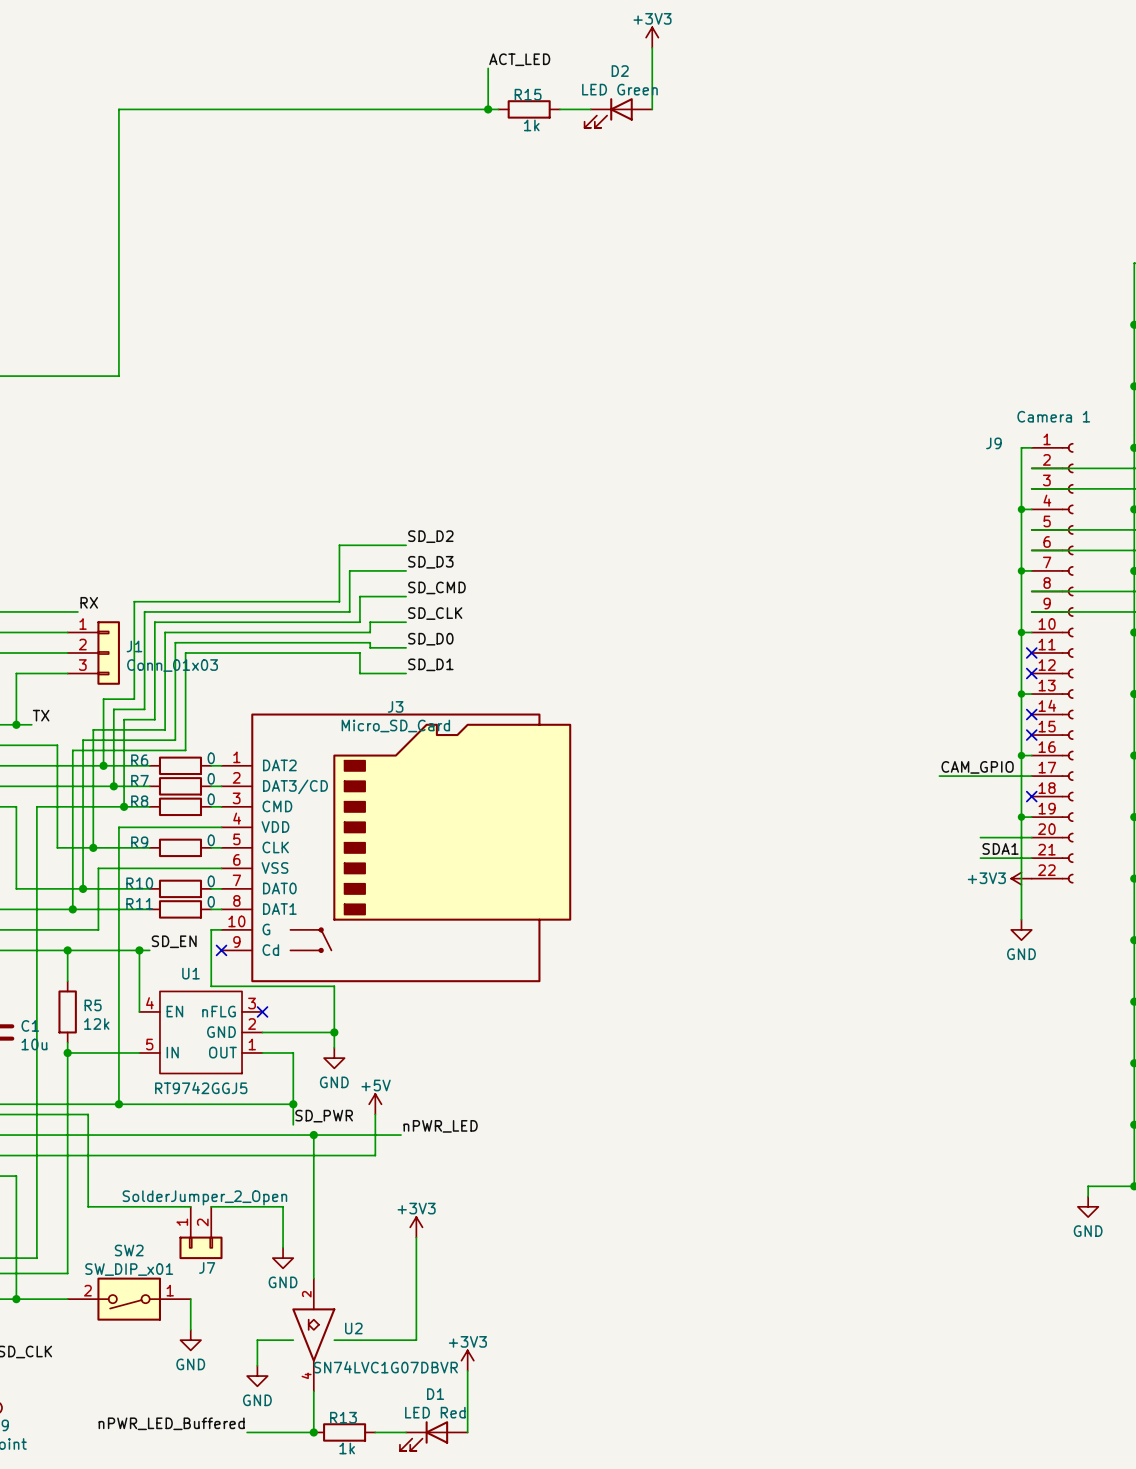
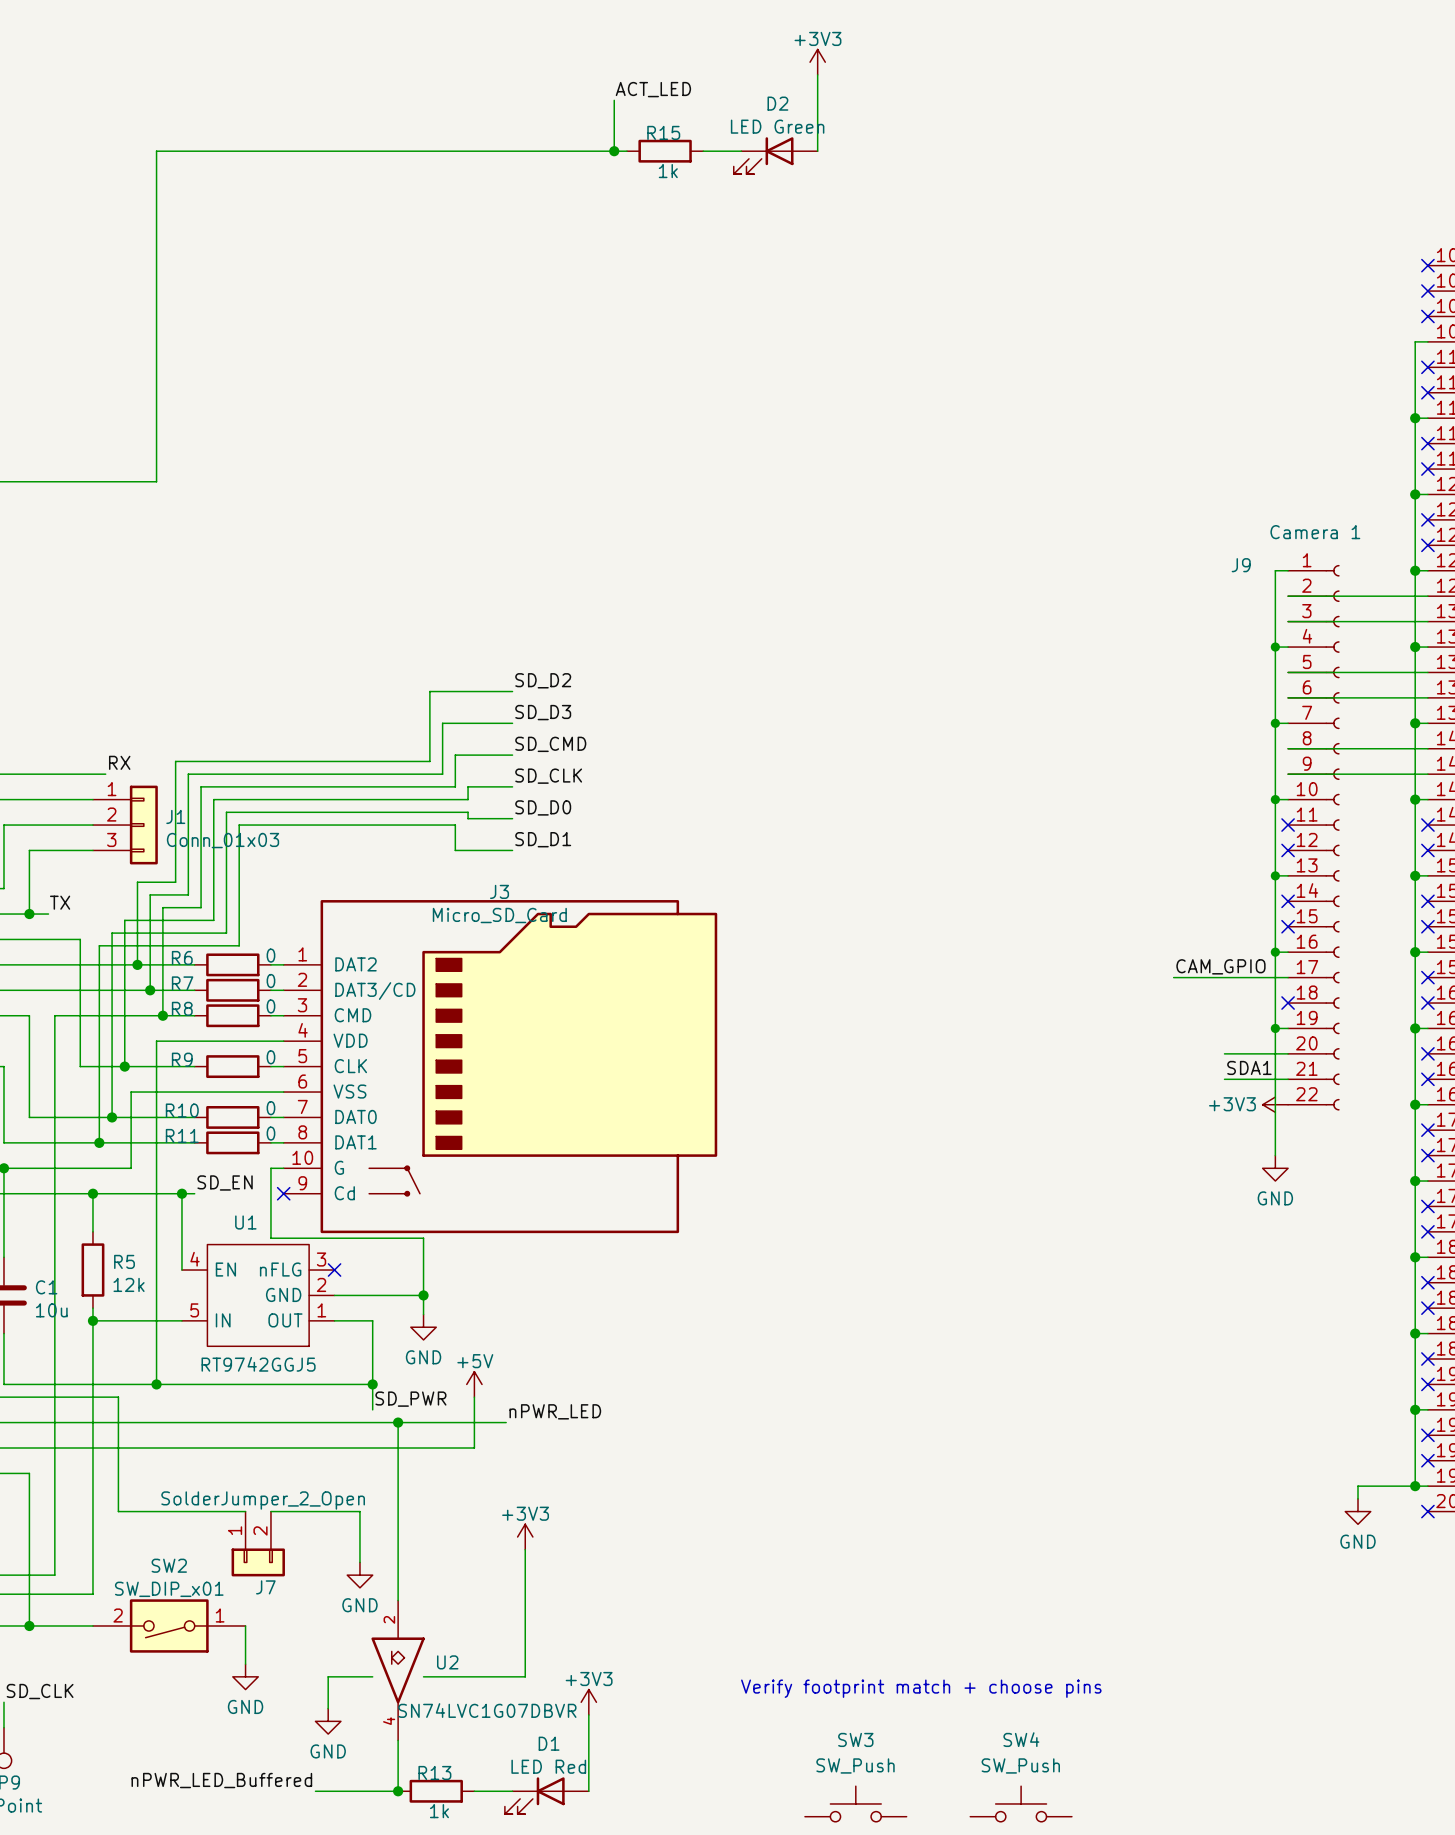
text: none -> Verify footprint match + choose pins (921, 1688)
SW3: none -> SW_Push (855, 1803)
SW4: none -> SW_Push (1021, 1803)

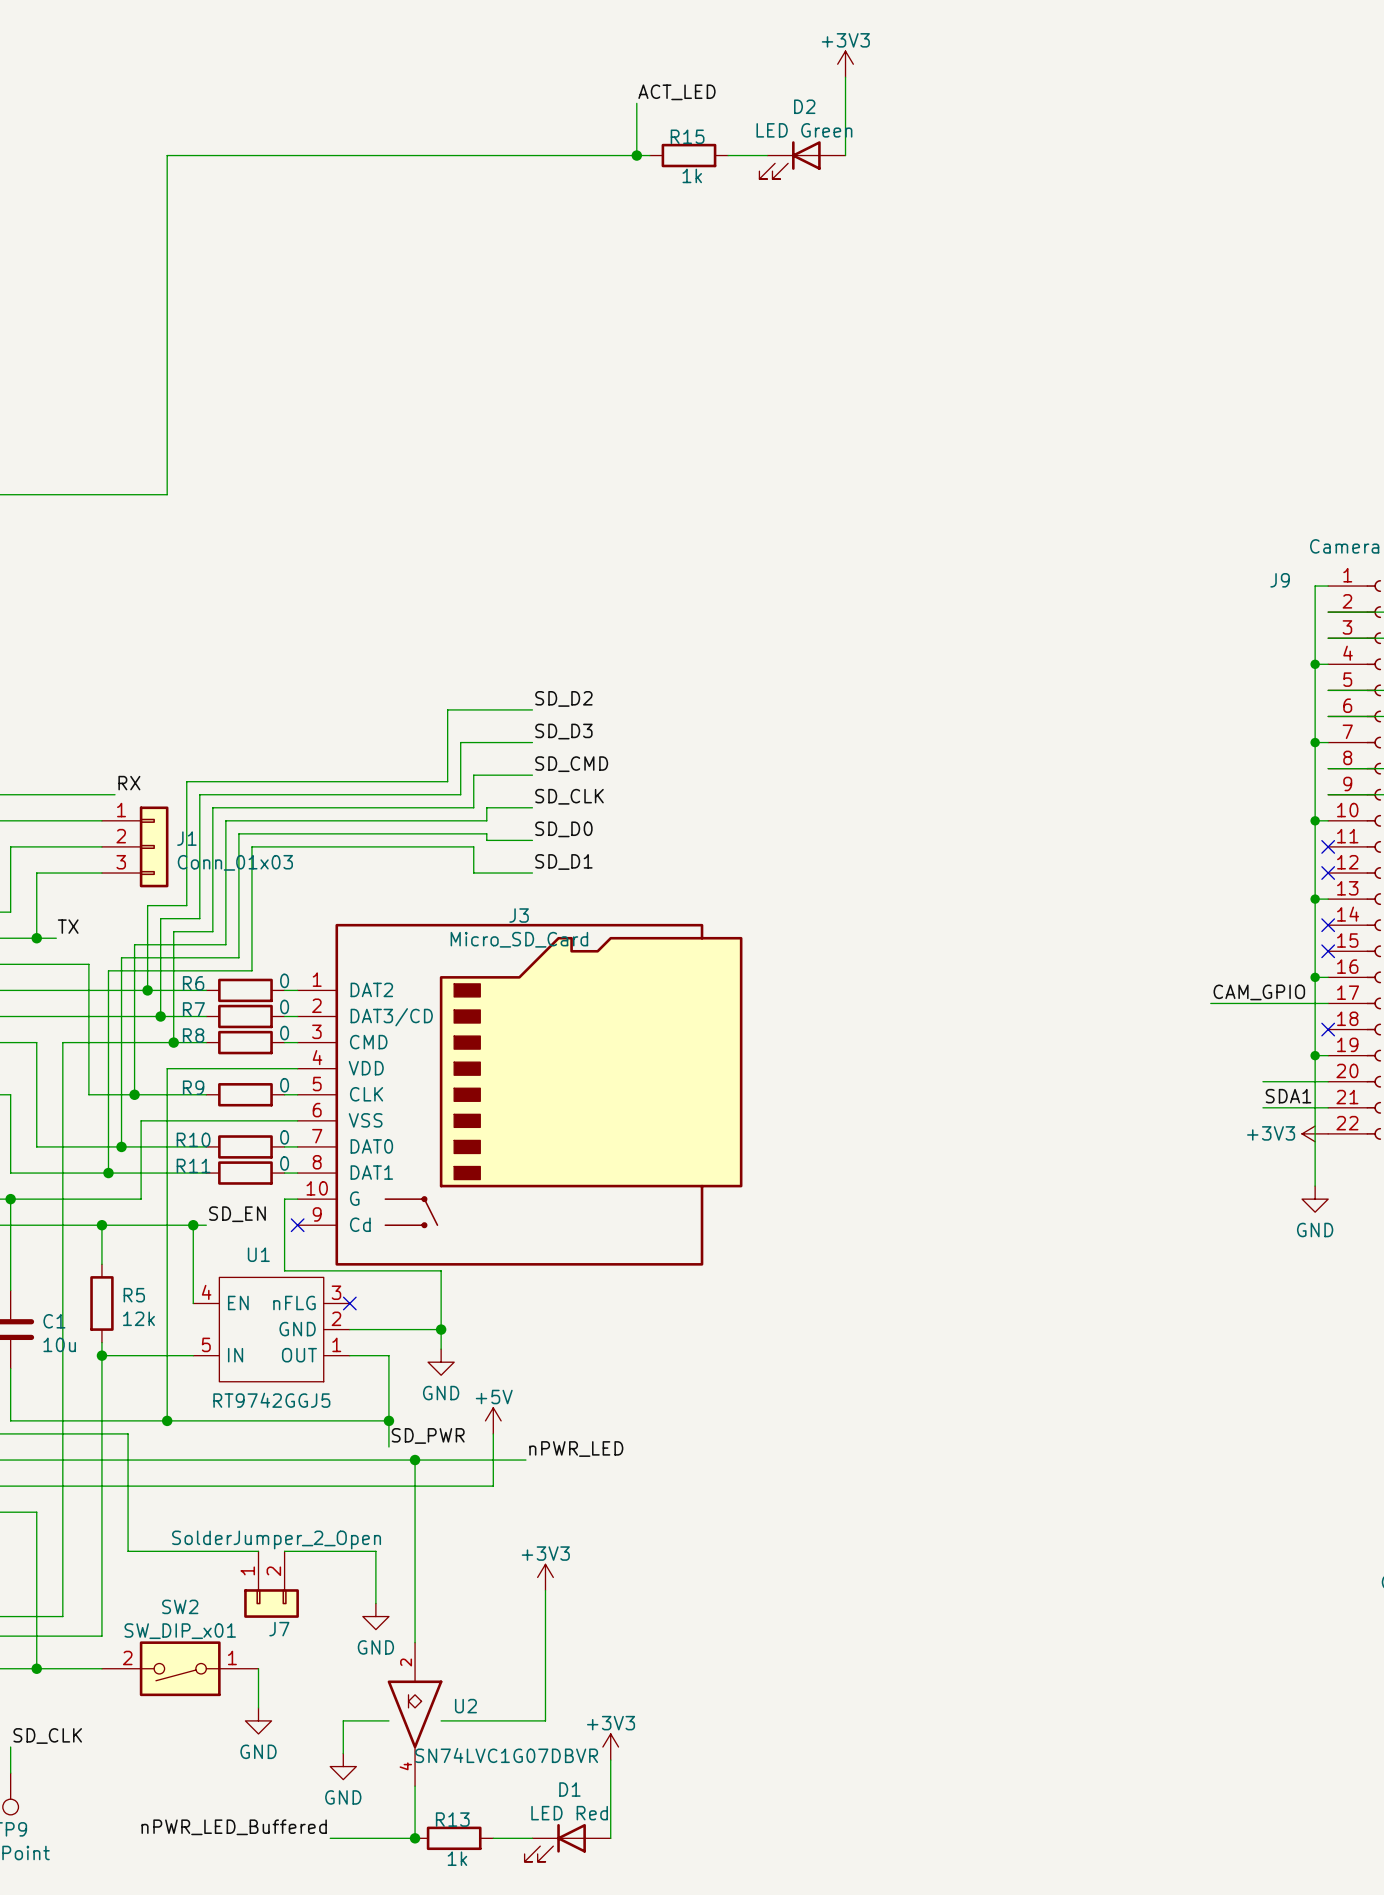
text: Verify footprint match + choose pins (921, 1688) -> none
SW3: SW_Push (855, 1803) -> none
SW4: SW_Push (1021, 1803) -> none

